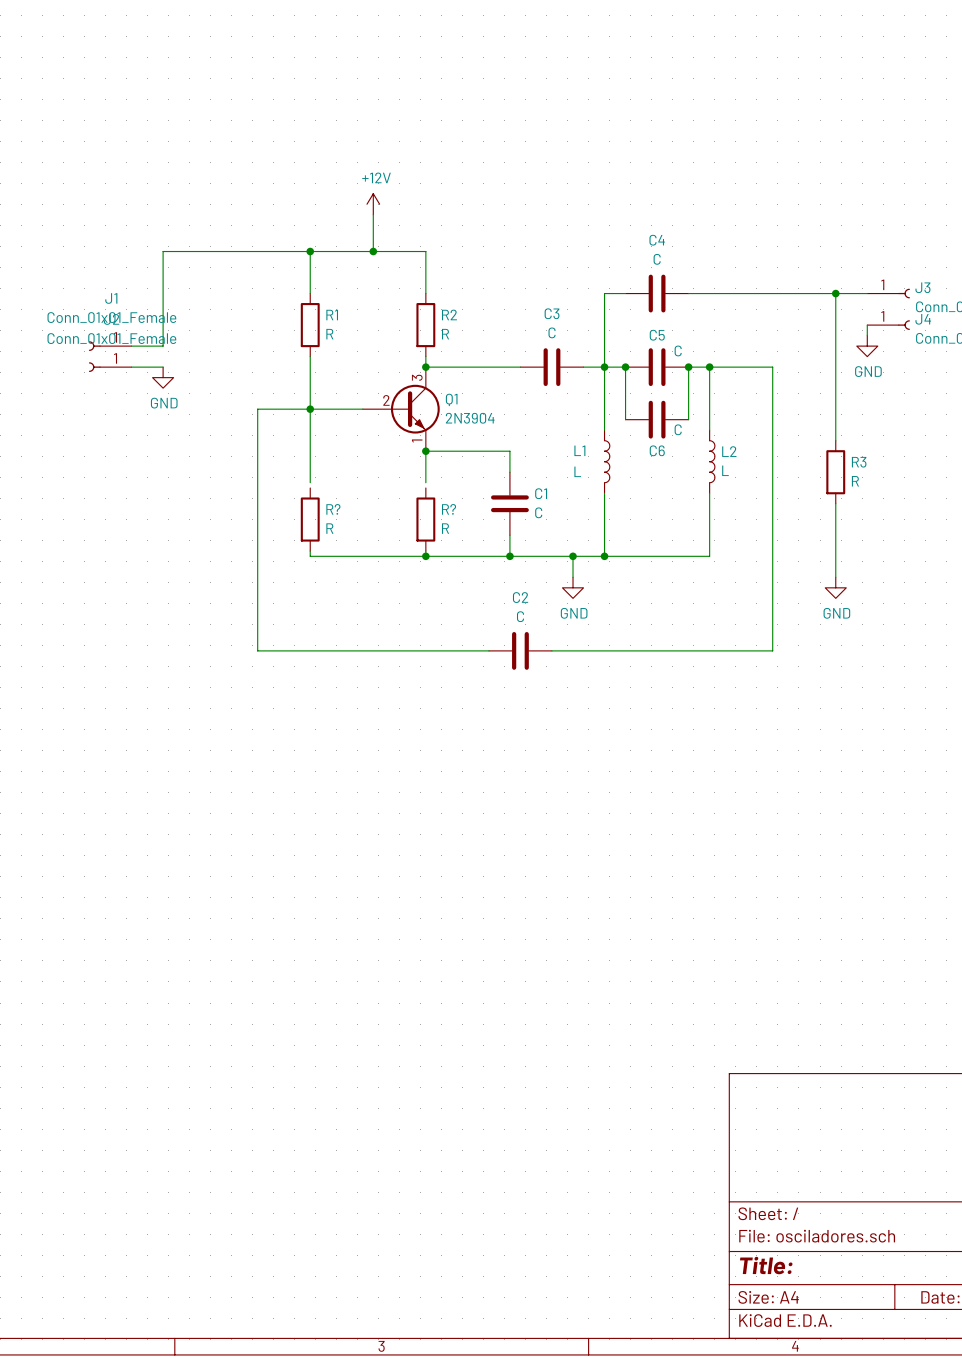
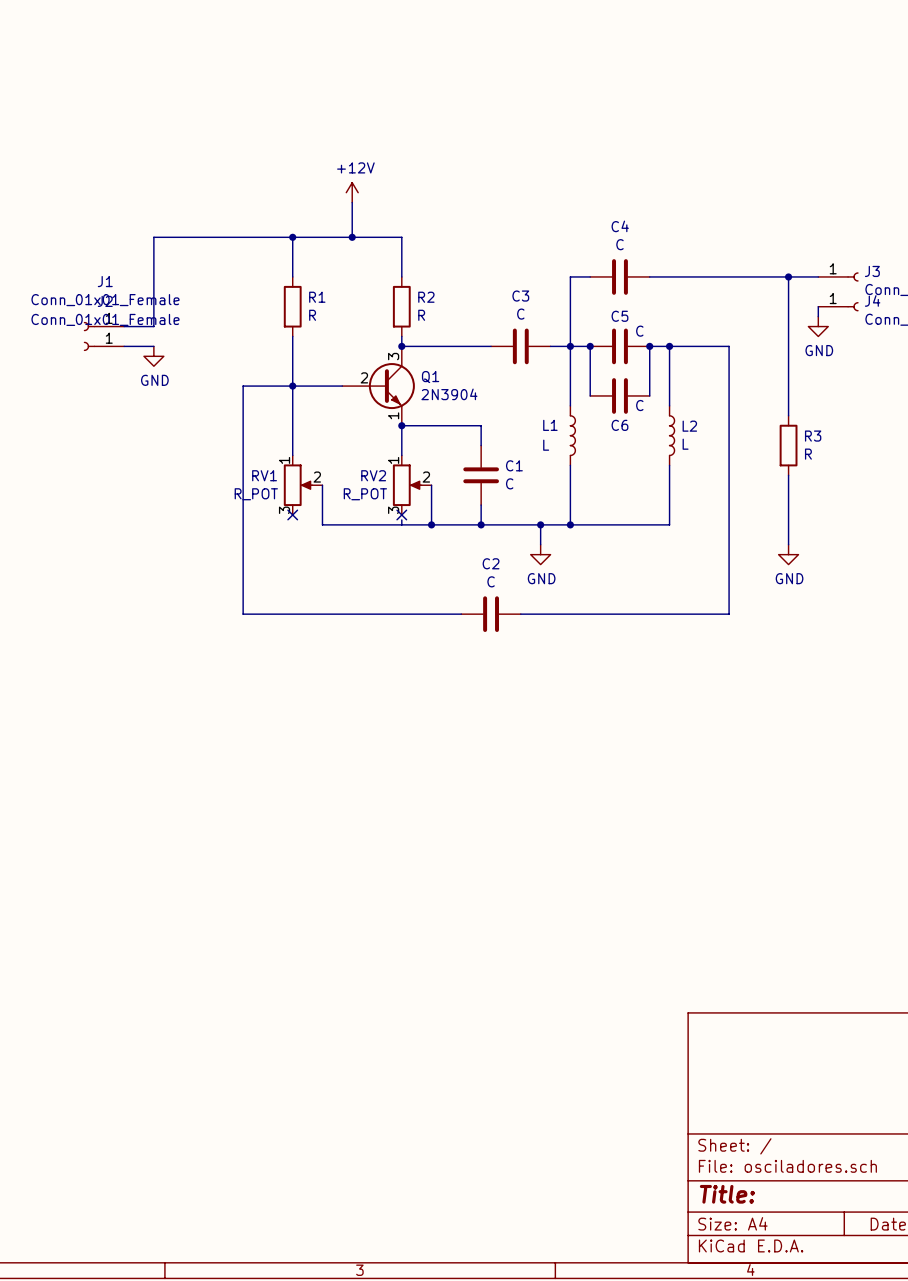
RV1: none -> R_POT (303, 485)
RV2: none -> R_POT (412, 485)
wire: none -> (431, 485) (431, 524)
R?: R (310, 519) -> none
R?: R (425, 519) -> none
no-connect mark: none -> (292, 514)
no-connect mark: none -> (401, 514)
wire: (310, 551) (310, 556) (341, 556) -> (322, 485) (322, 524)
junction position: (425, 556) -> (431, 524)

